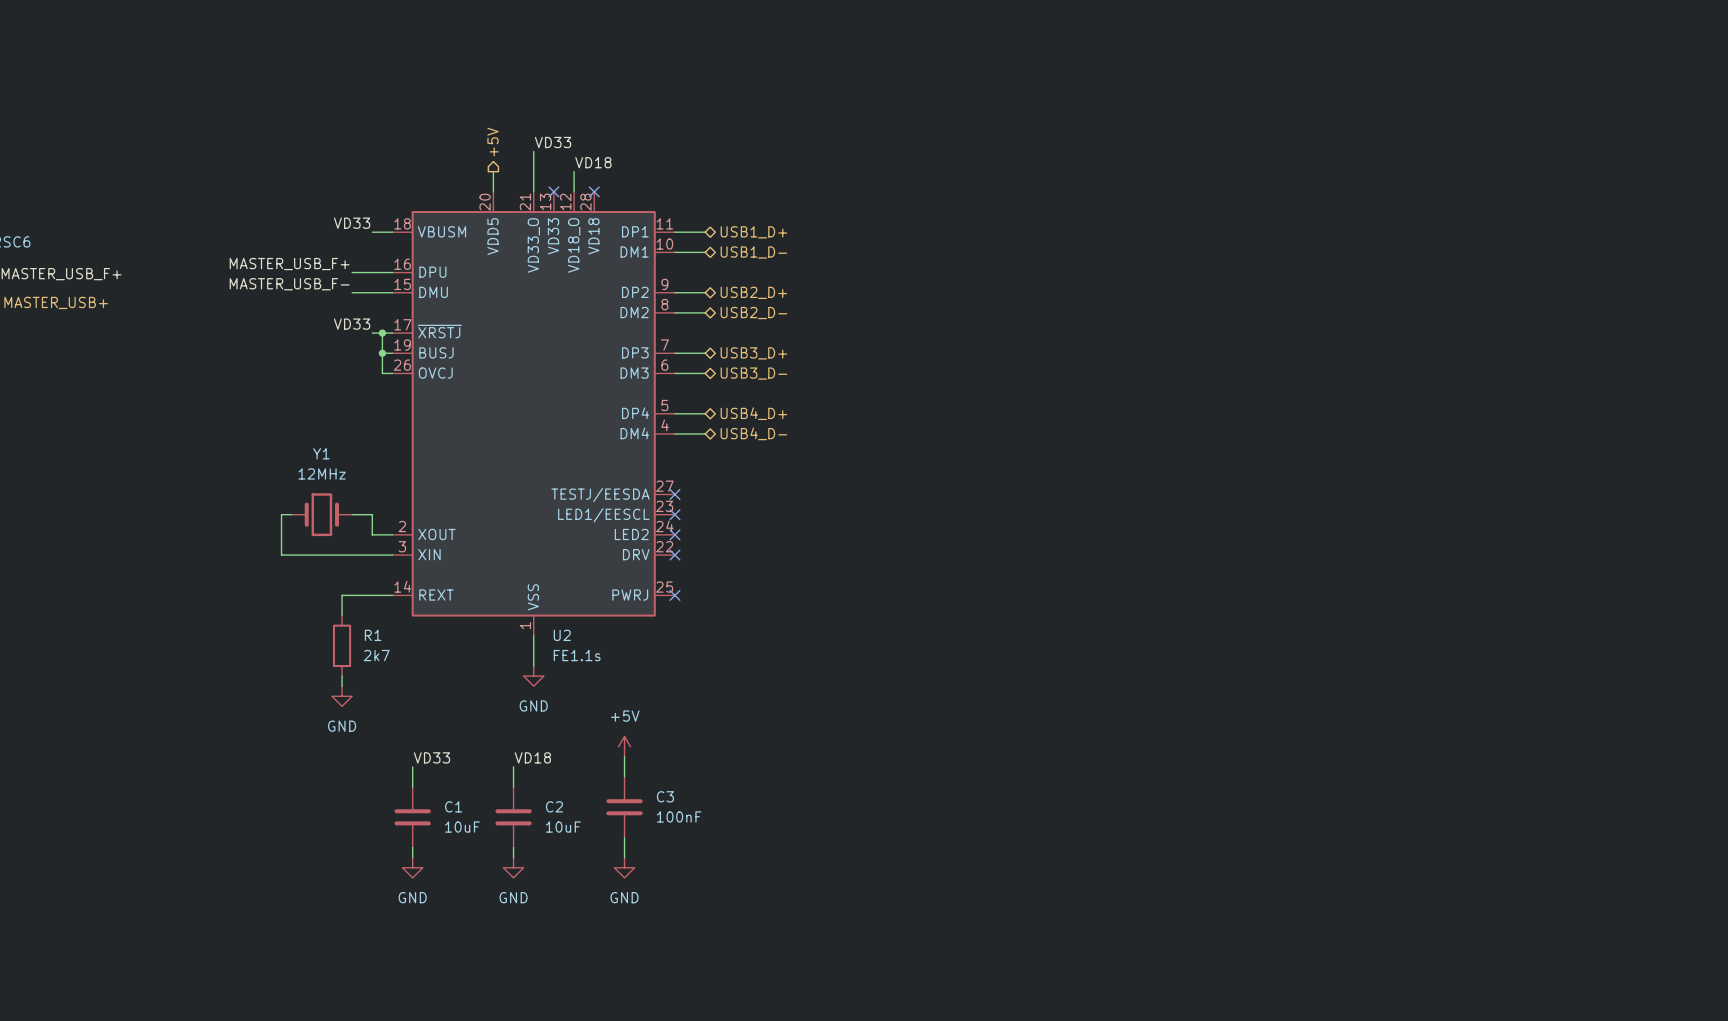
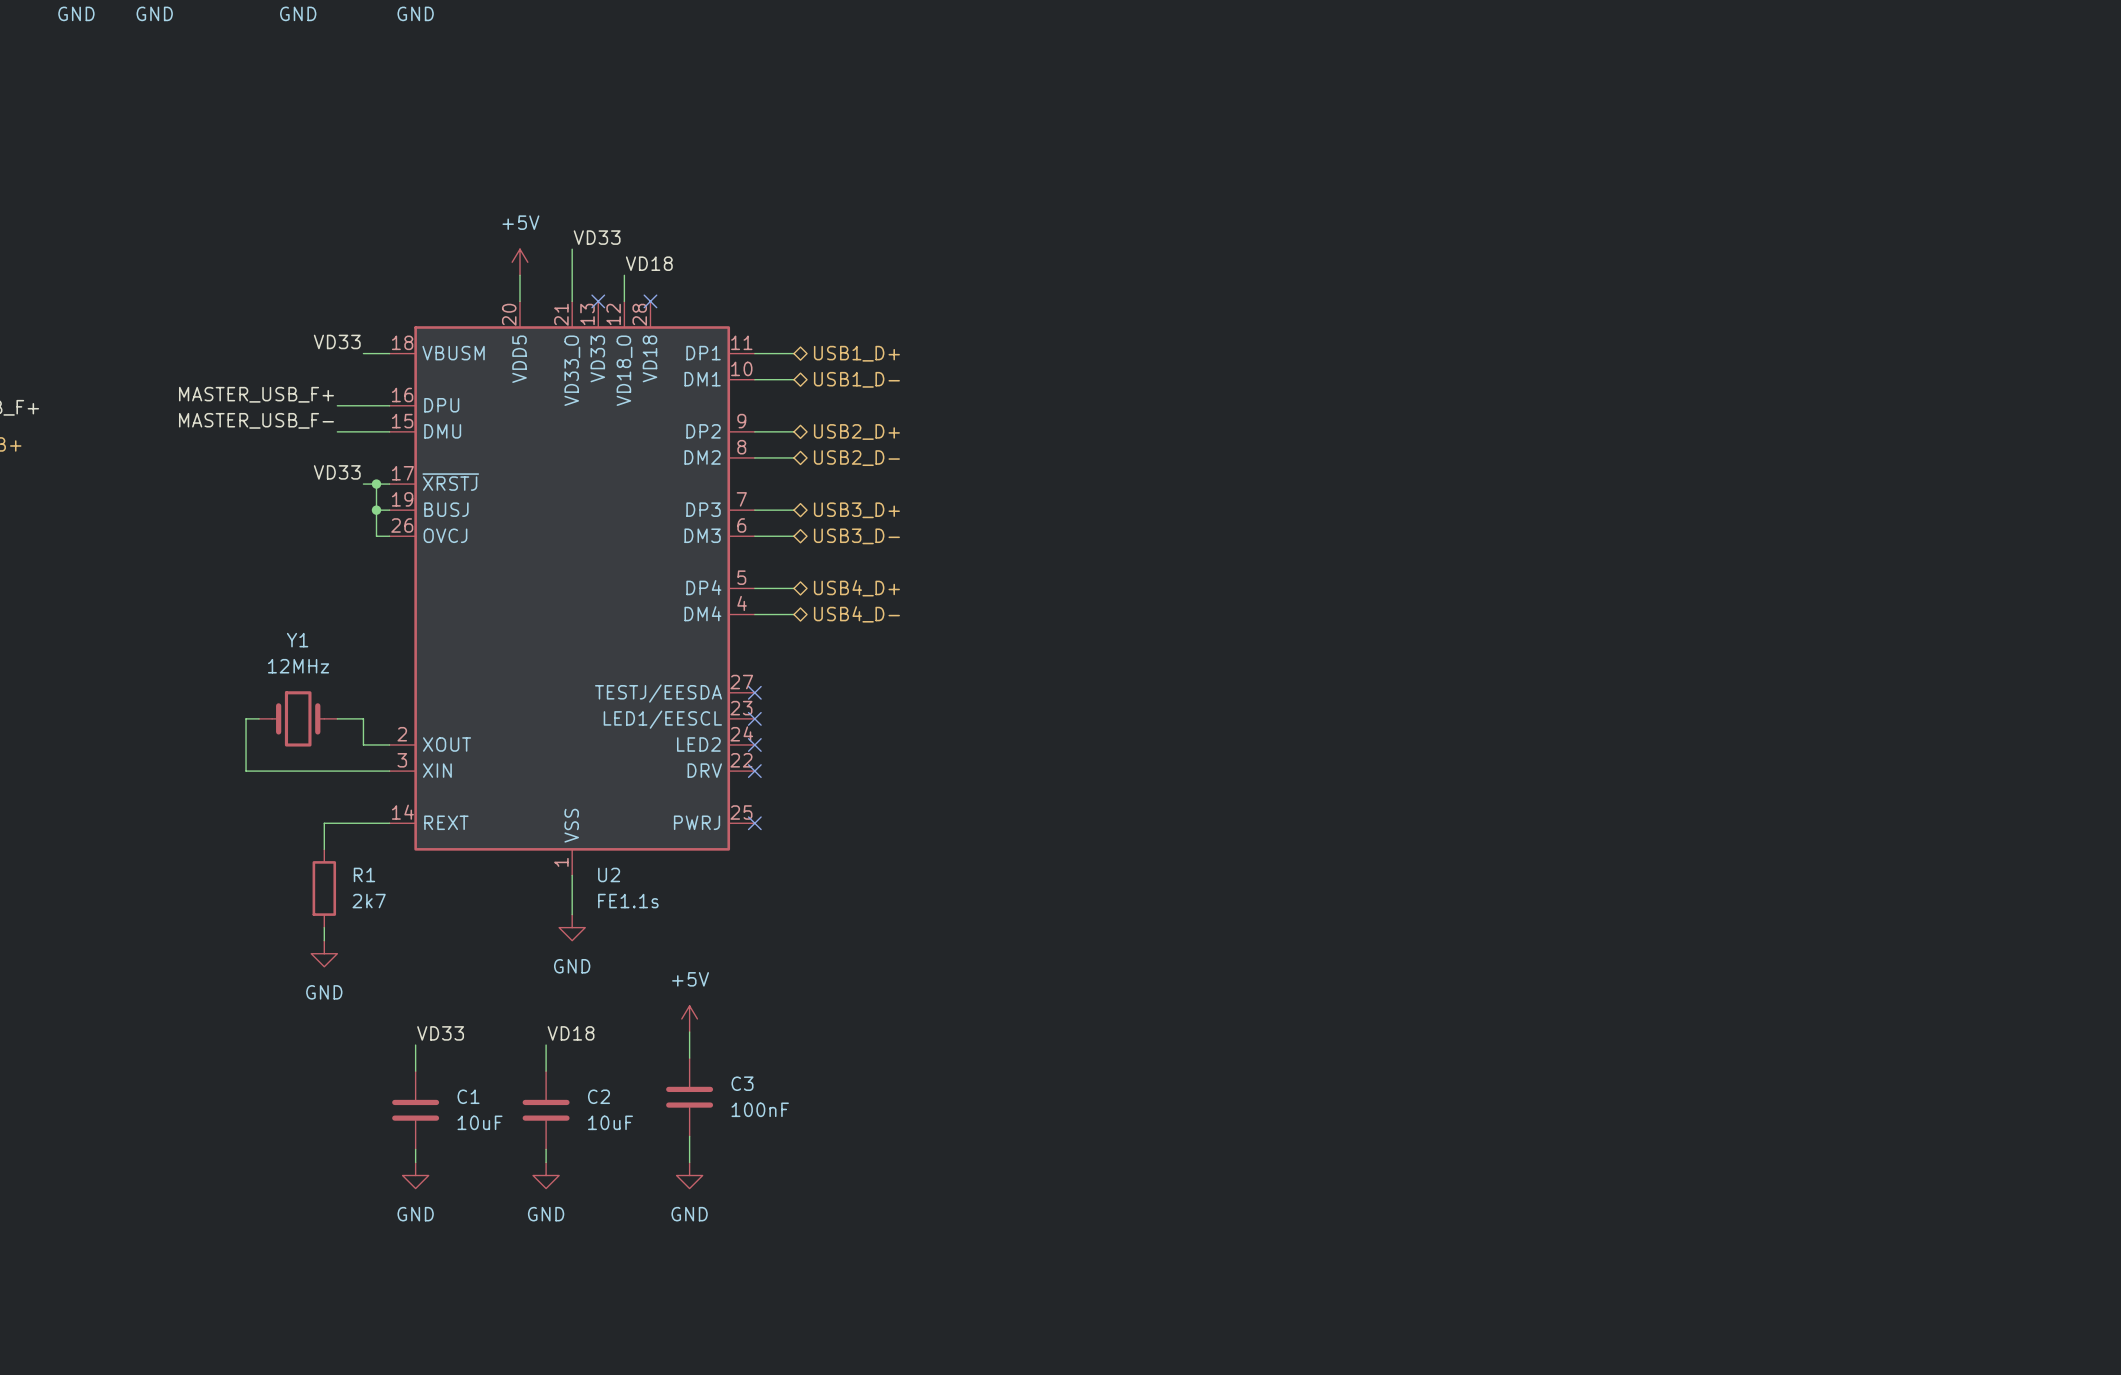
hierarchical label: +5V (493, 141) -> none
power symbol: none -> +5V (520, 262)

